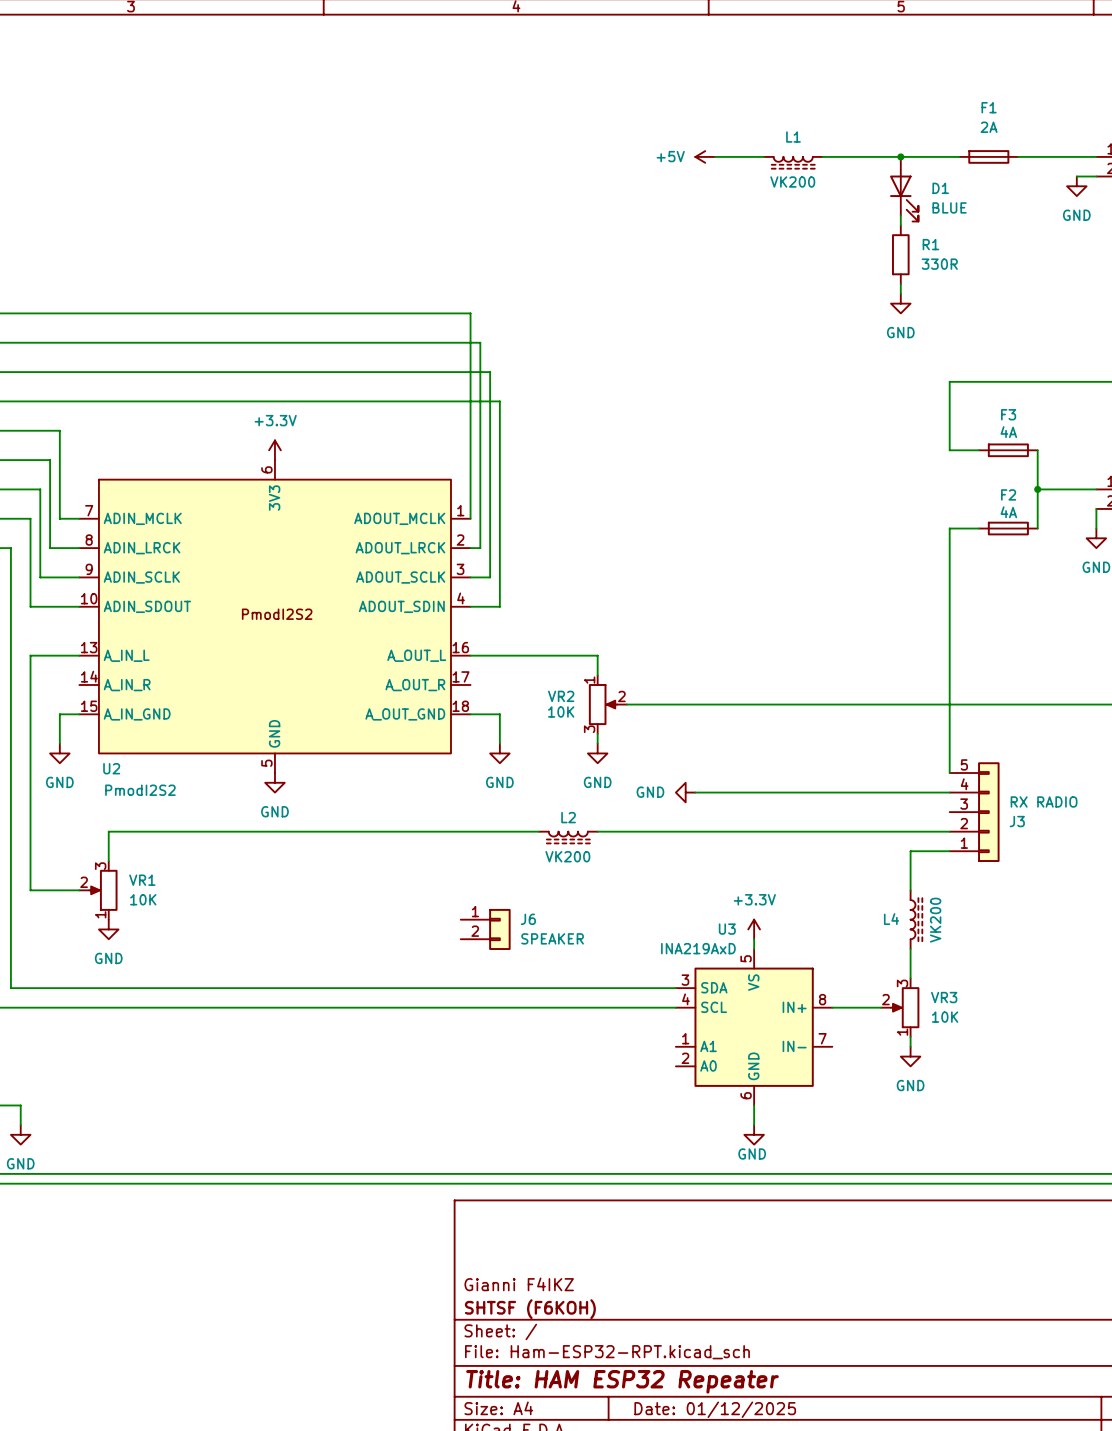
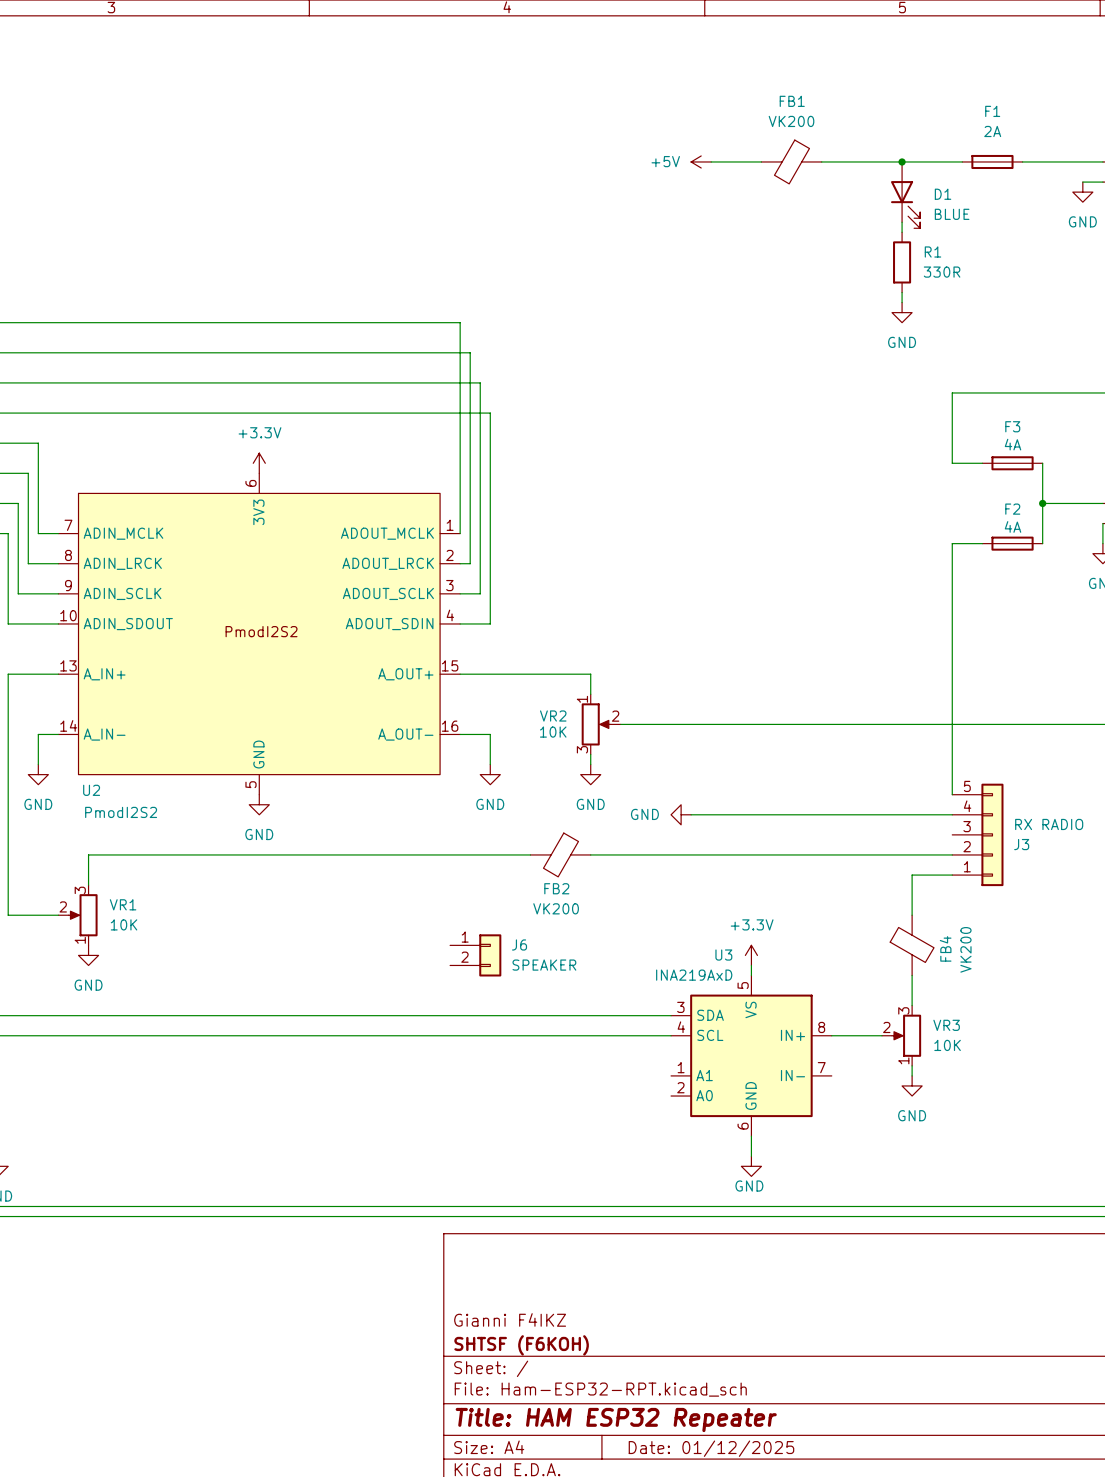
FB1: none -> VK200 (791, 161)
L1: VK200 (793, 162) -> none
U2 symbol: [79, 460, 471, 774] -> [58, 473, 461, 795]
FB2: none -> VK200 (560, 854)
L2: VK200 (568, 837) -> none
FB4: none -> VK200 (912, 945)
L4: VK200 (916, 919) -> none

